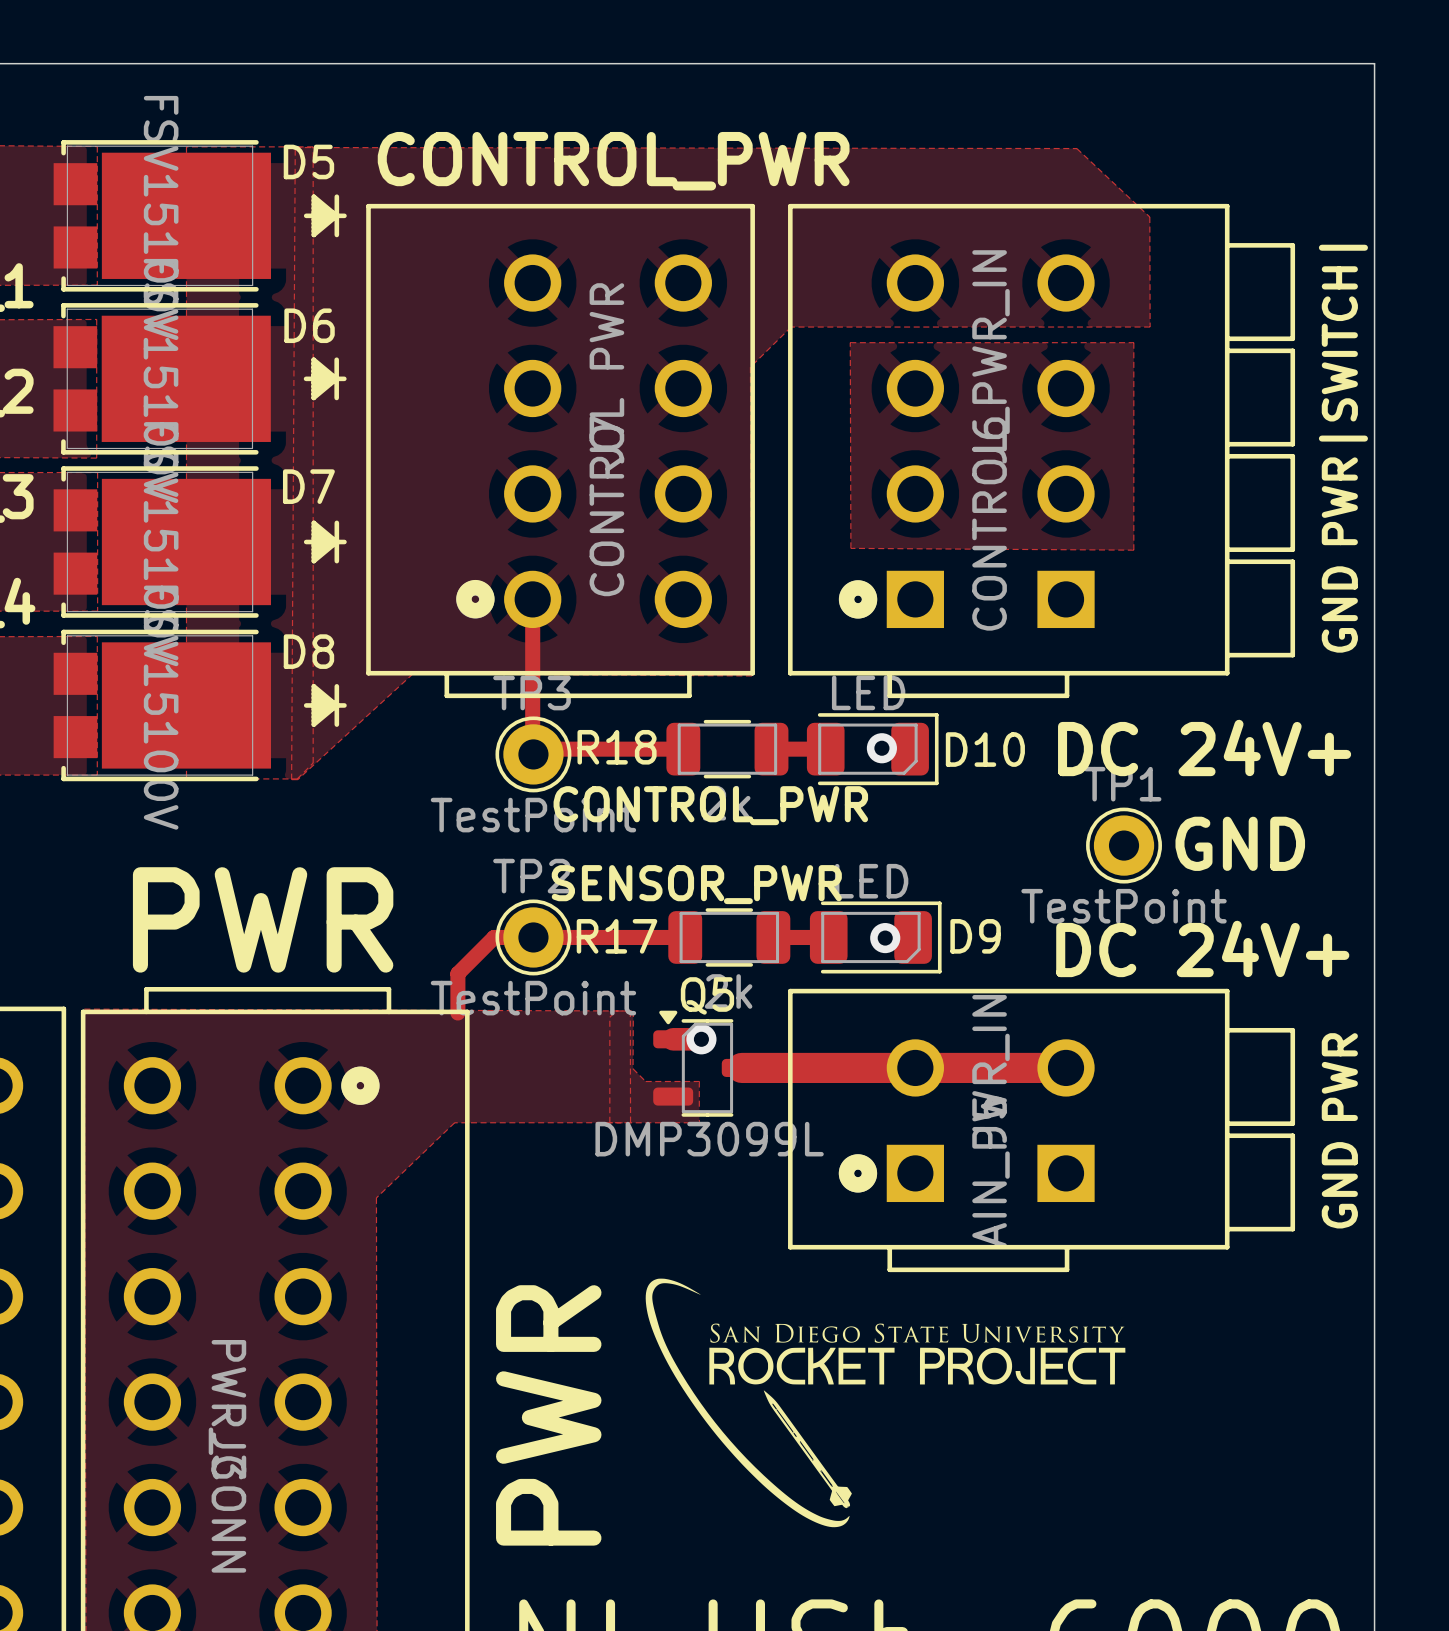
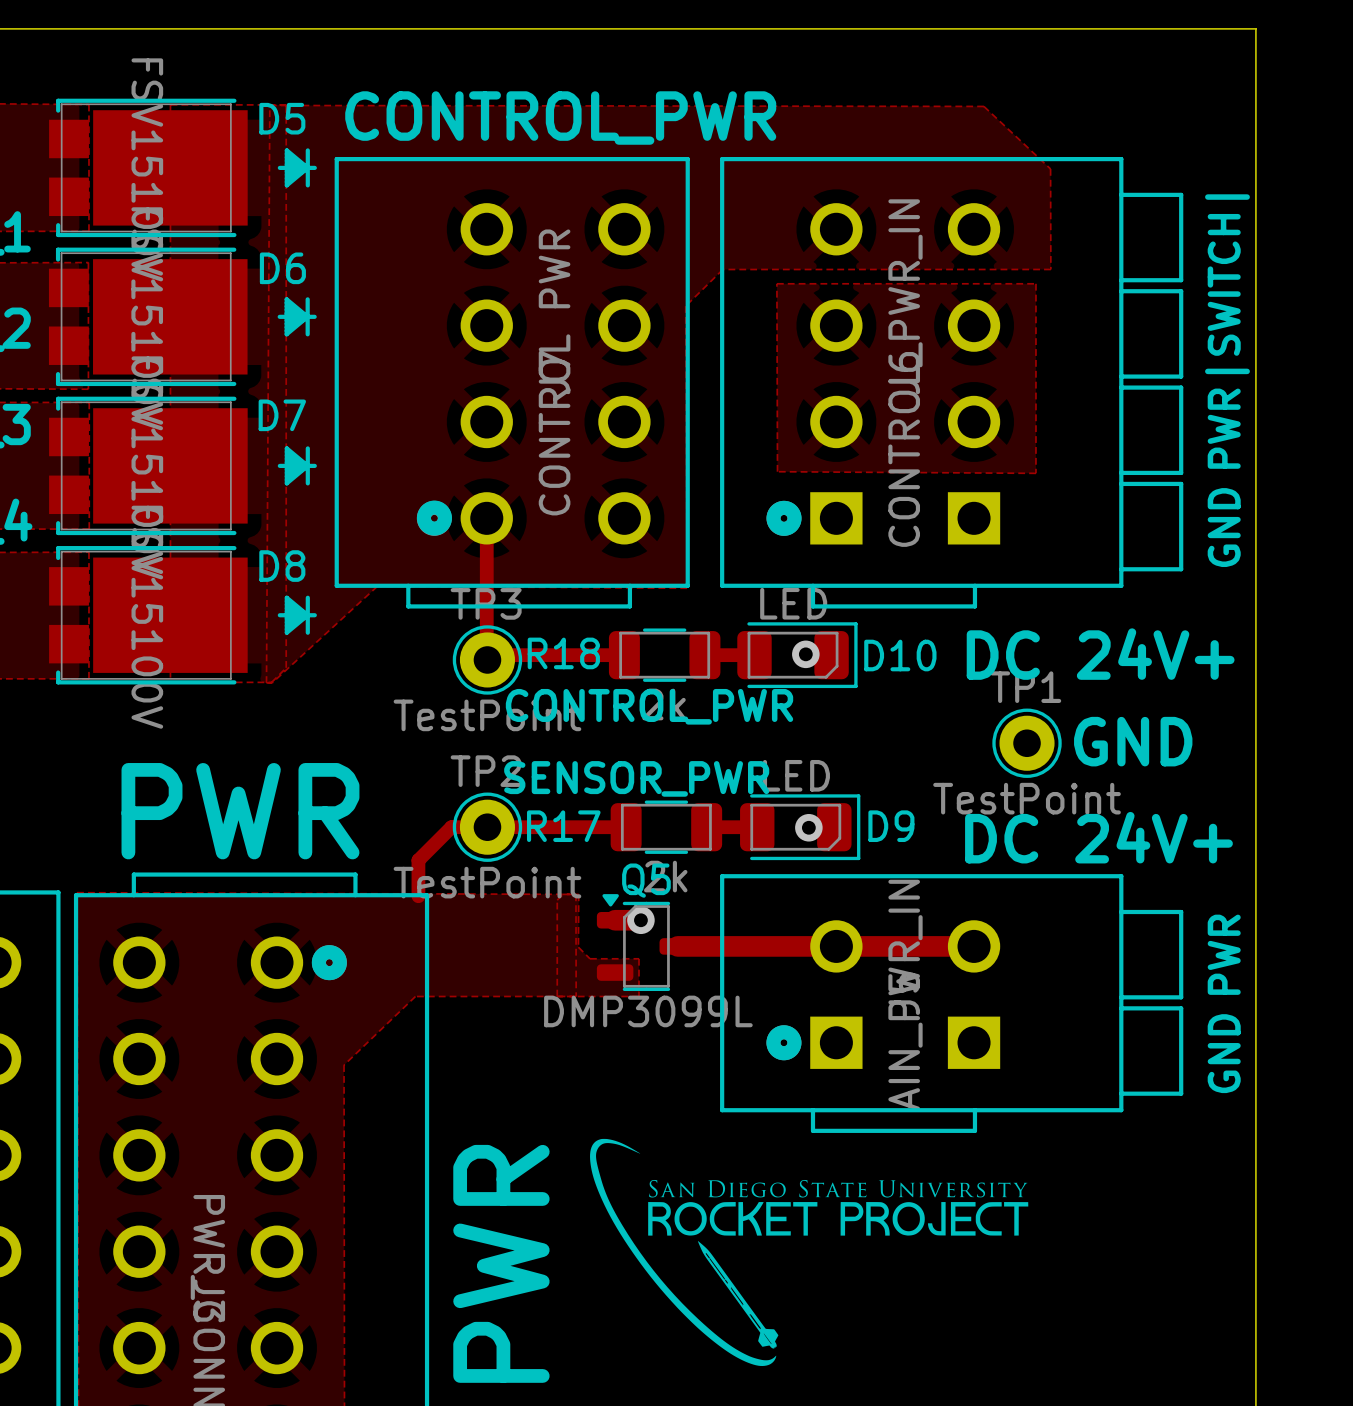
track width: thick (741, 1067) (1066, 1067) -> thin (677, 946) (974, 946)

